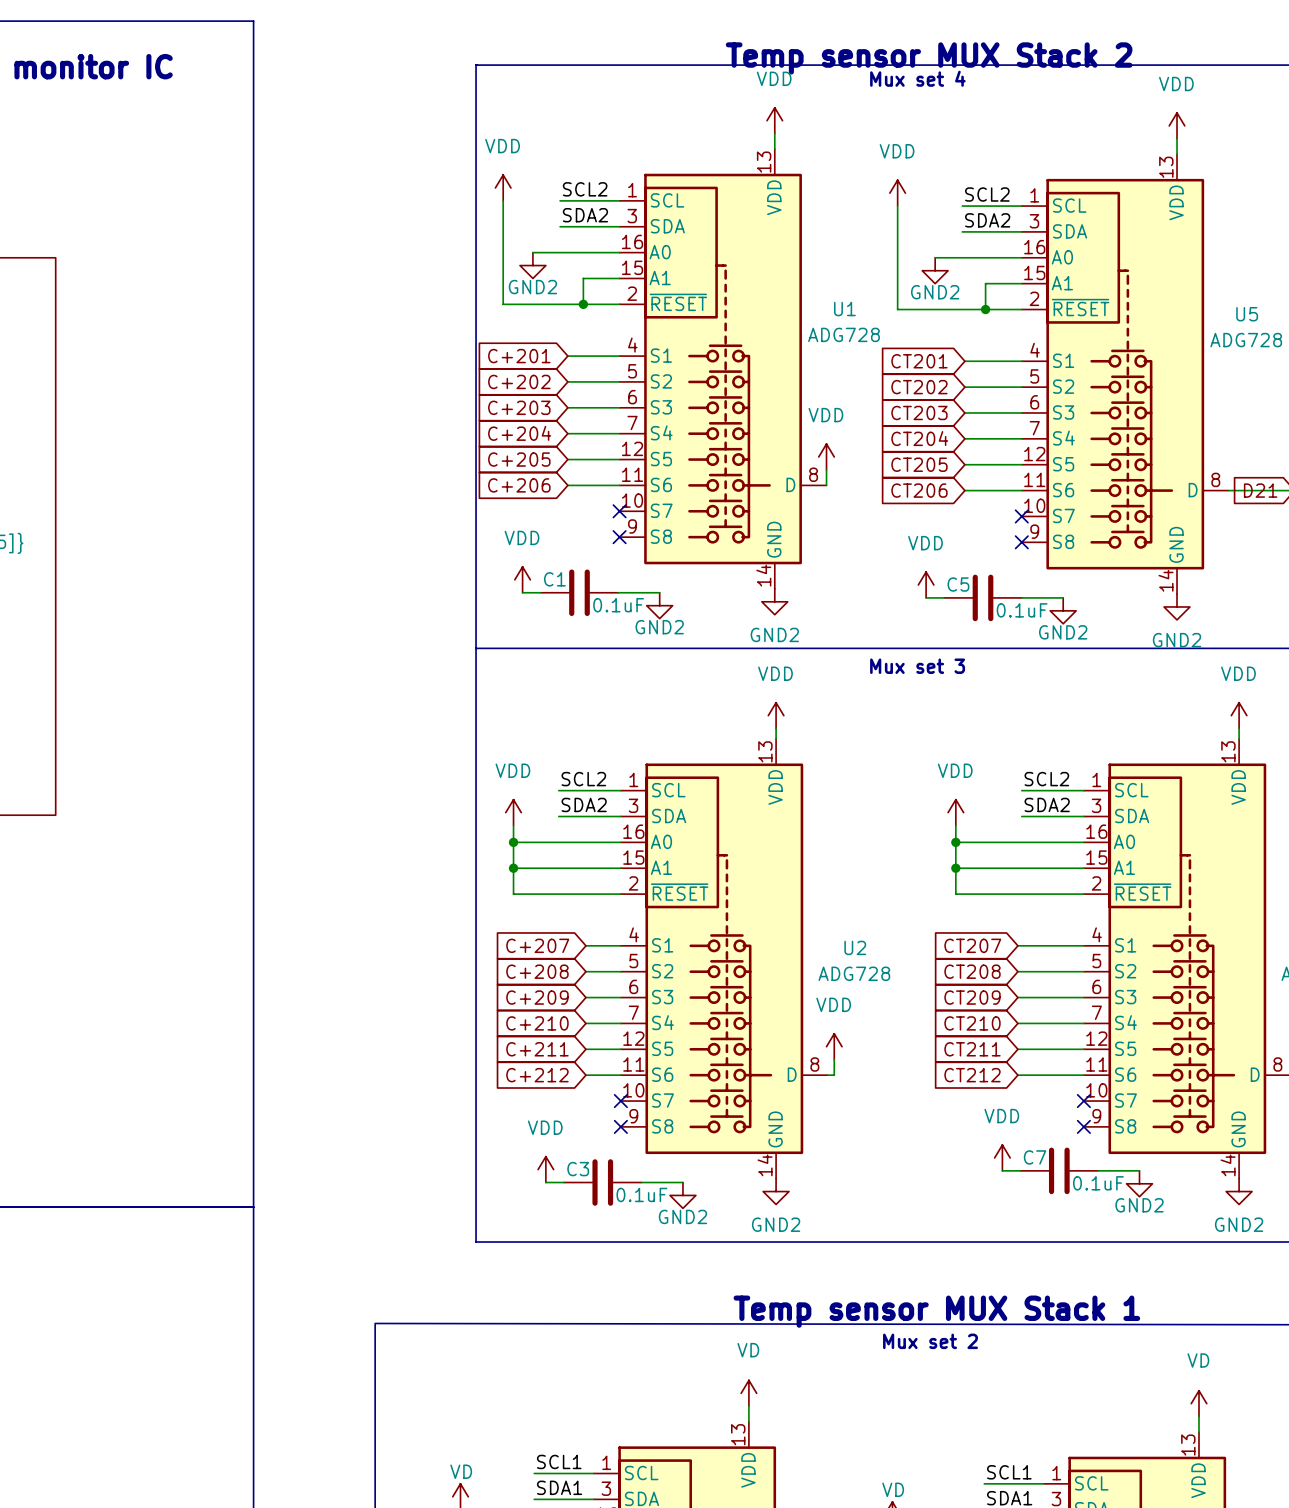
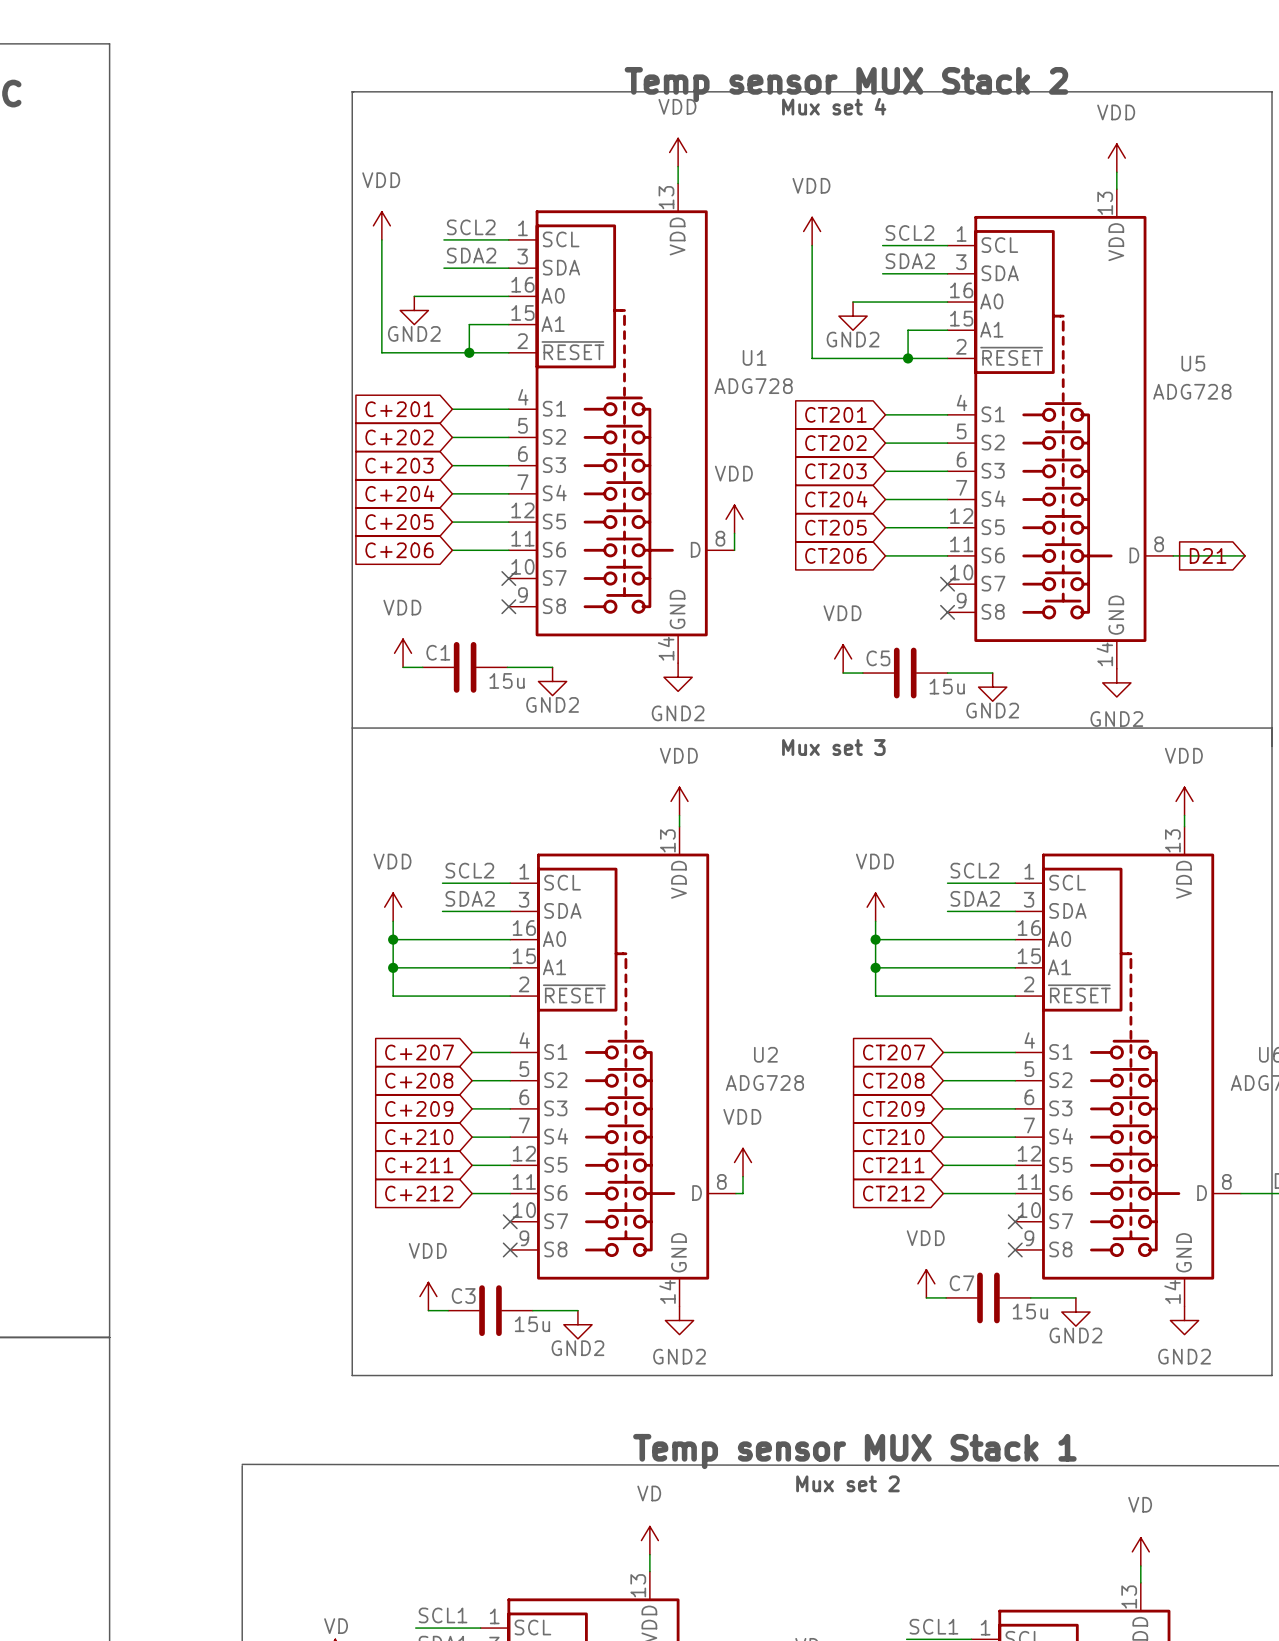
C1 value: 0.1uF (618, 605) -> 15u (507, 680)
C5 value: 0.1uF (1022, 610) -> 15u (947, 686)
C7 value: 0.1uF (1098, 1183) -> 15u (1030, 1311)
C3 value: 0.1uF (641, 1194) -> 15u (532, 1324)

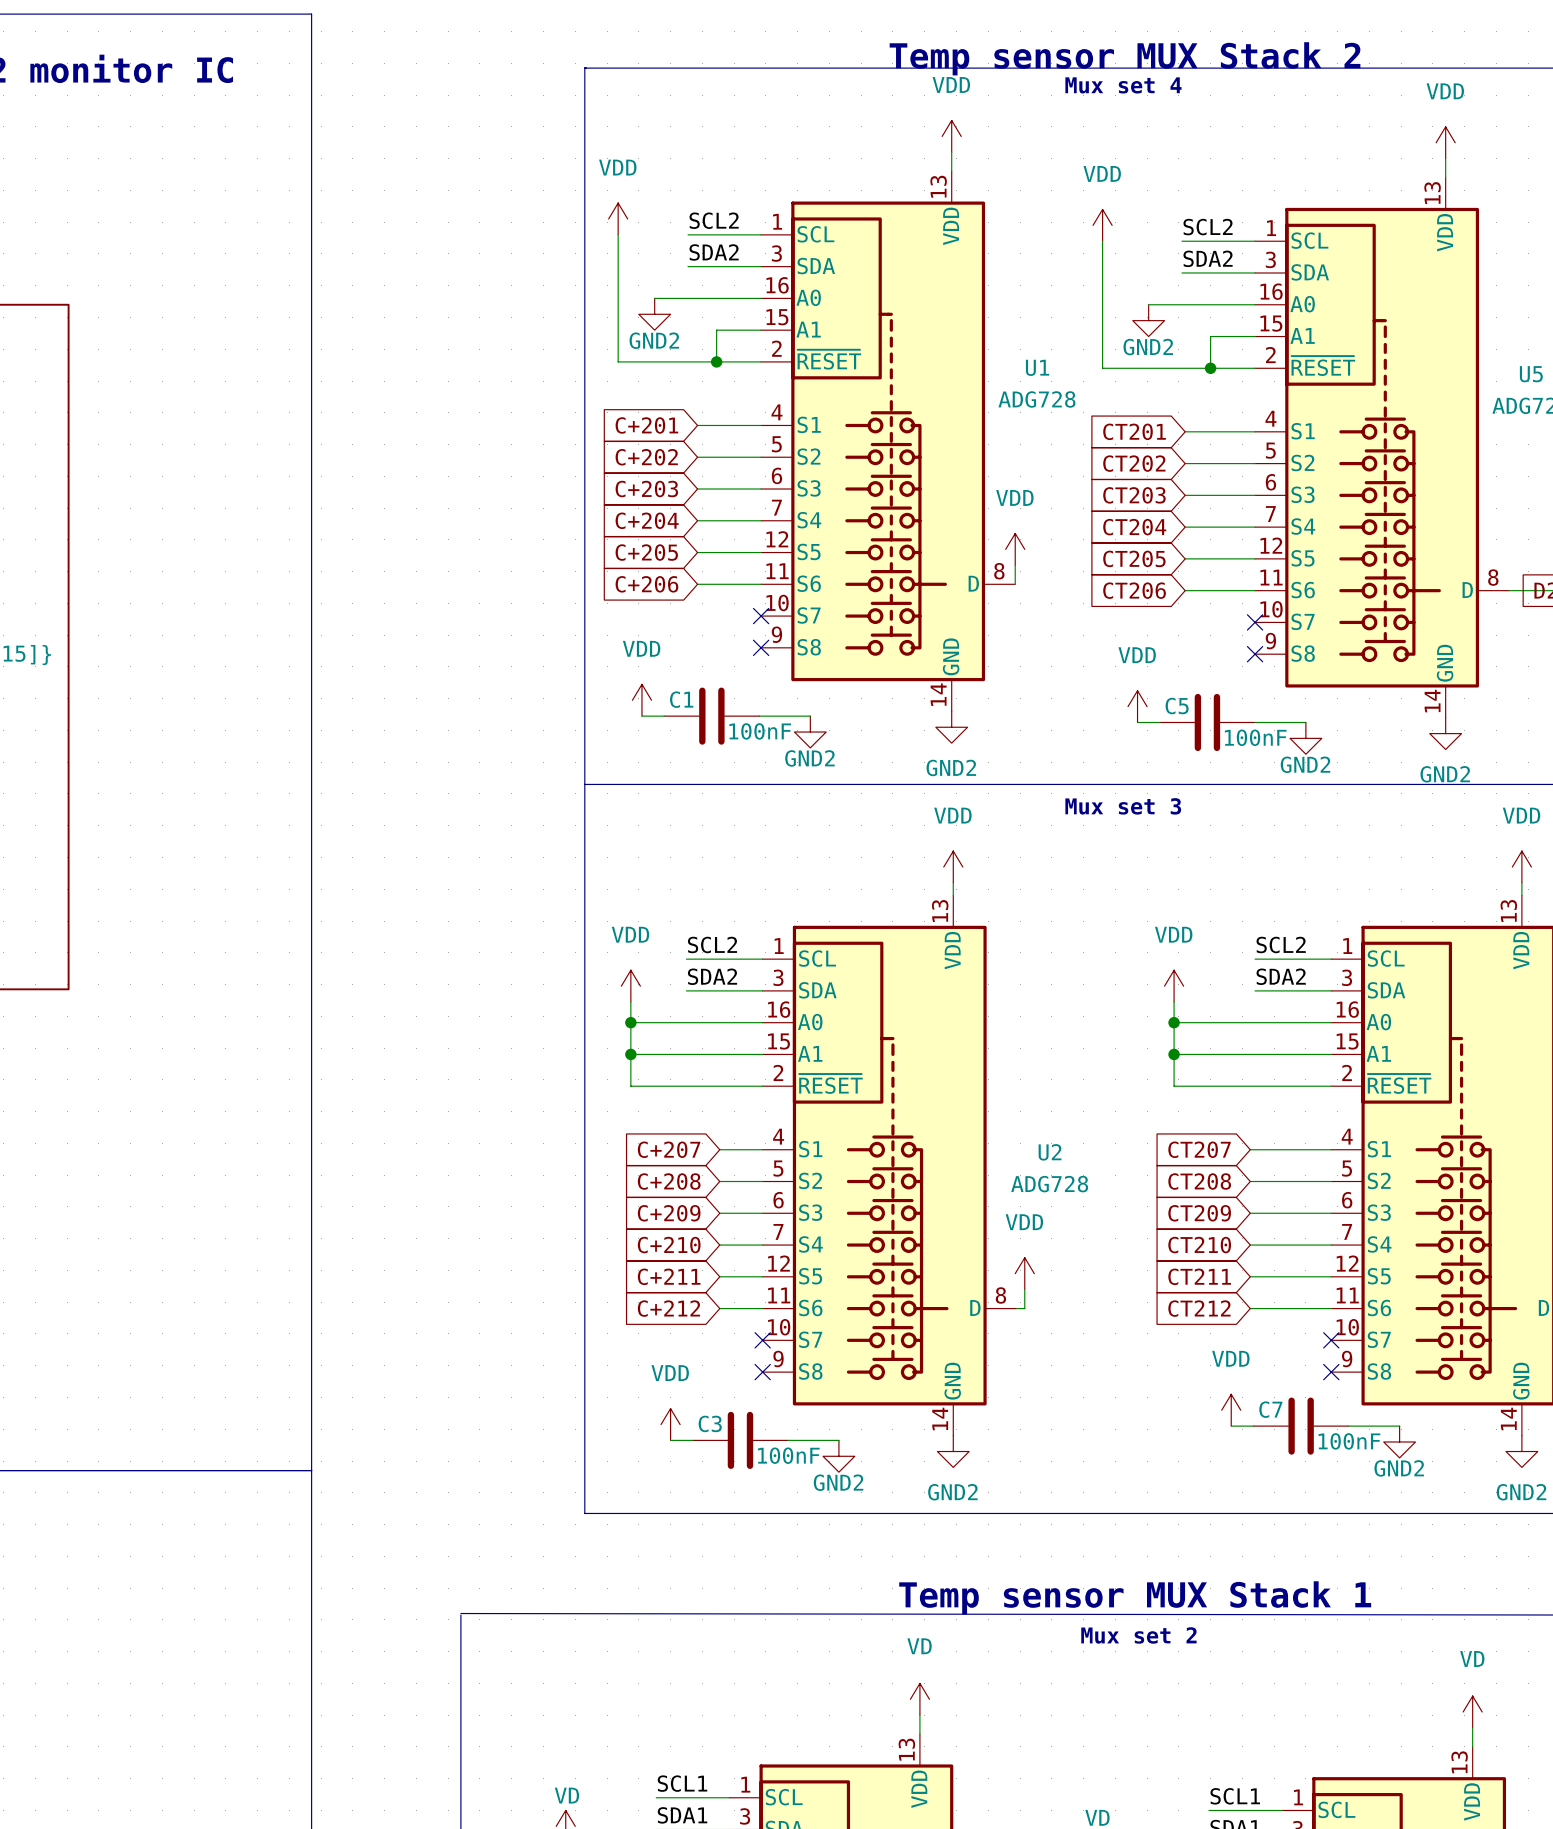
C1 value: 15u (507, 680) -> 100nF (760, 731)
C5 value: 15u (947, 686) -> 100nF (1255, 737)
C7 value: 15u (1030, 1311) -> 100nF (1349, 1441)
C3 value: 15u (532, 1324) -> 100nF (788, 1455)

